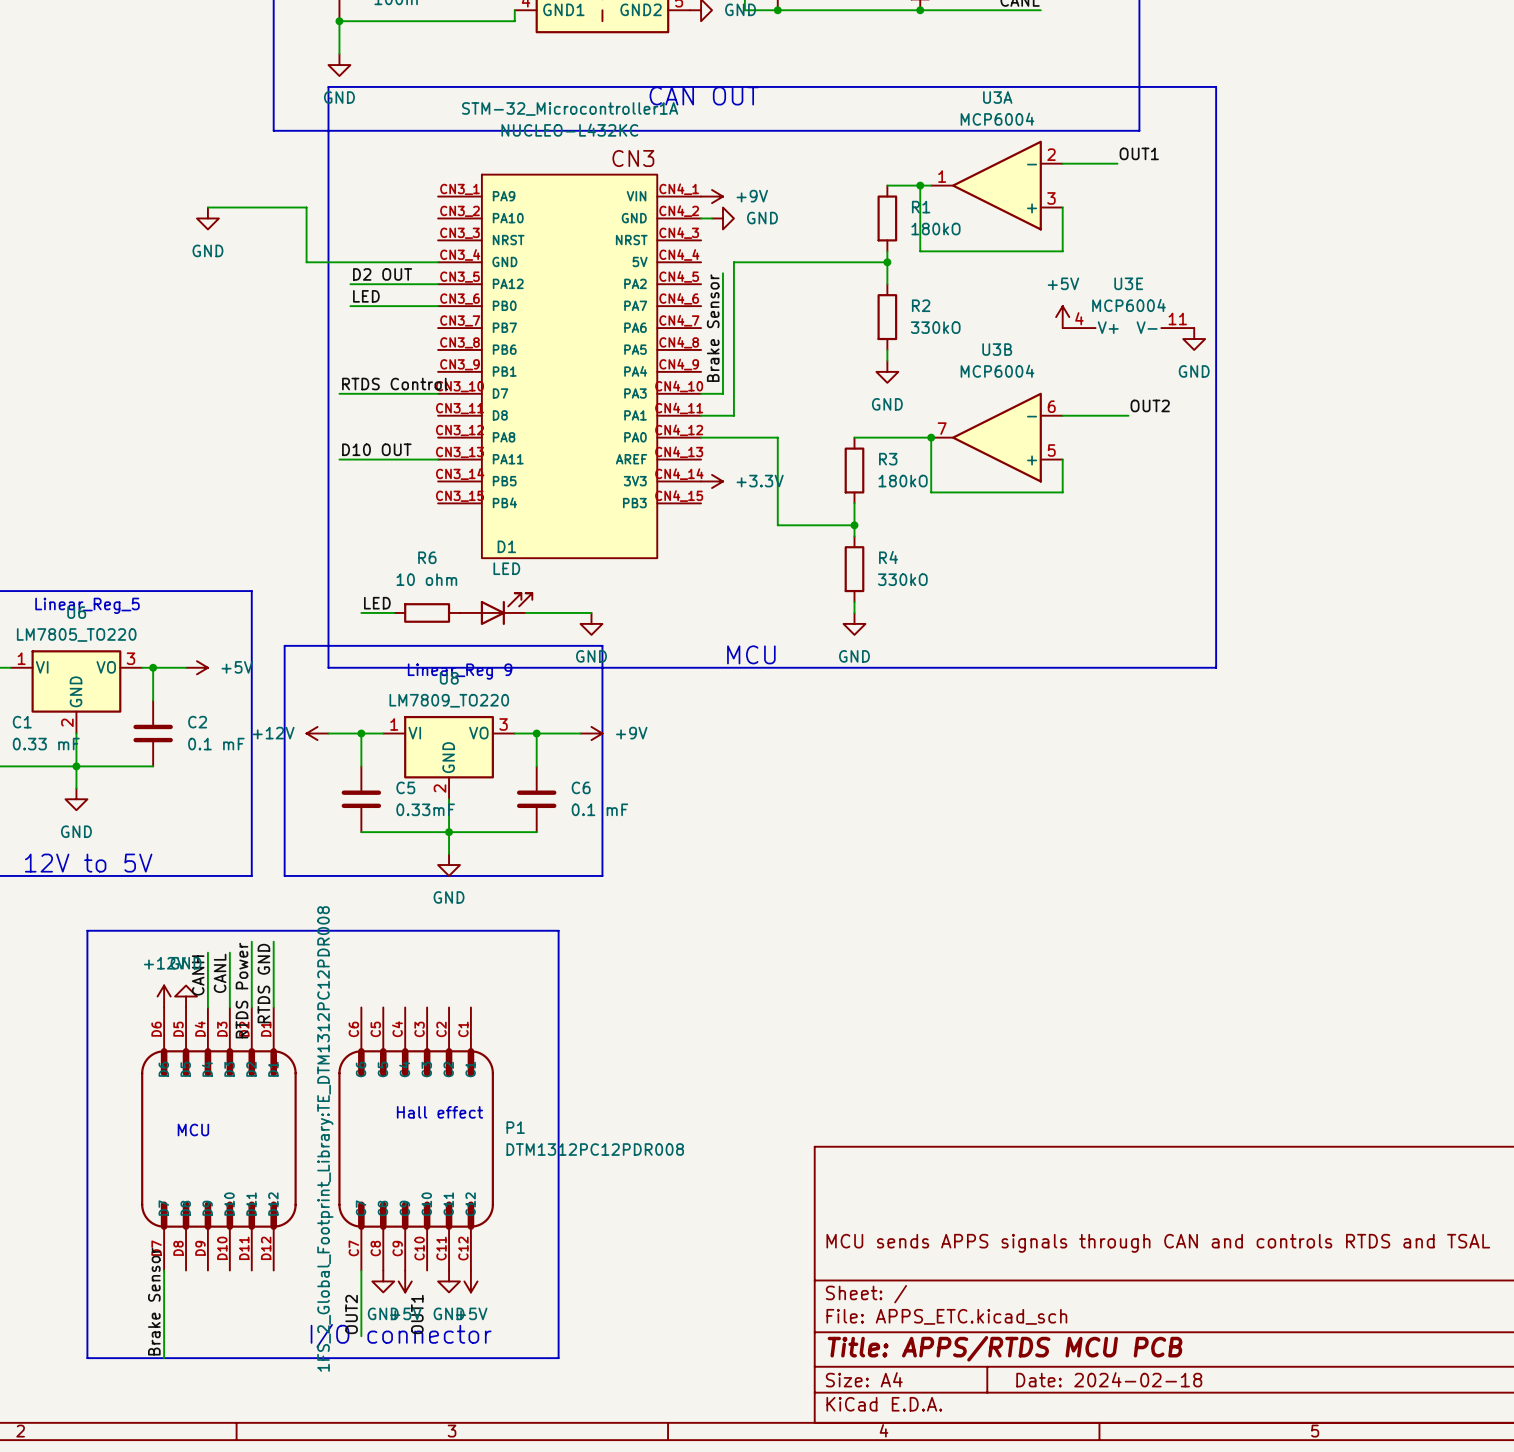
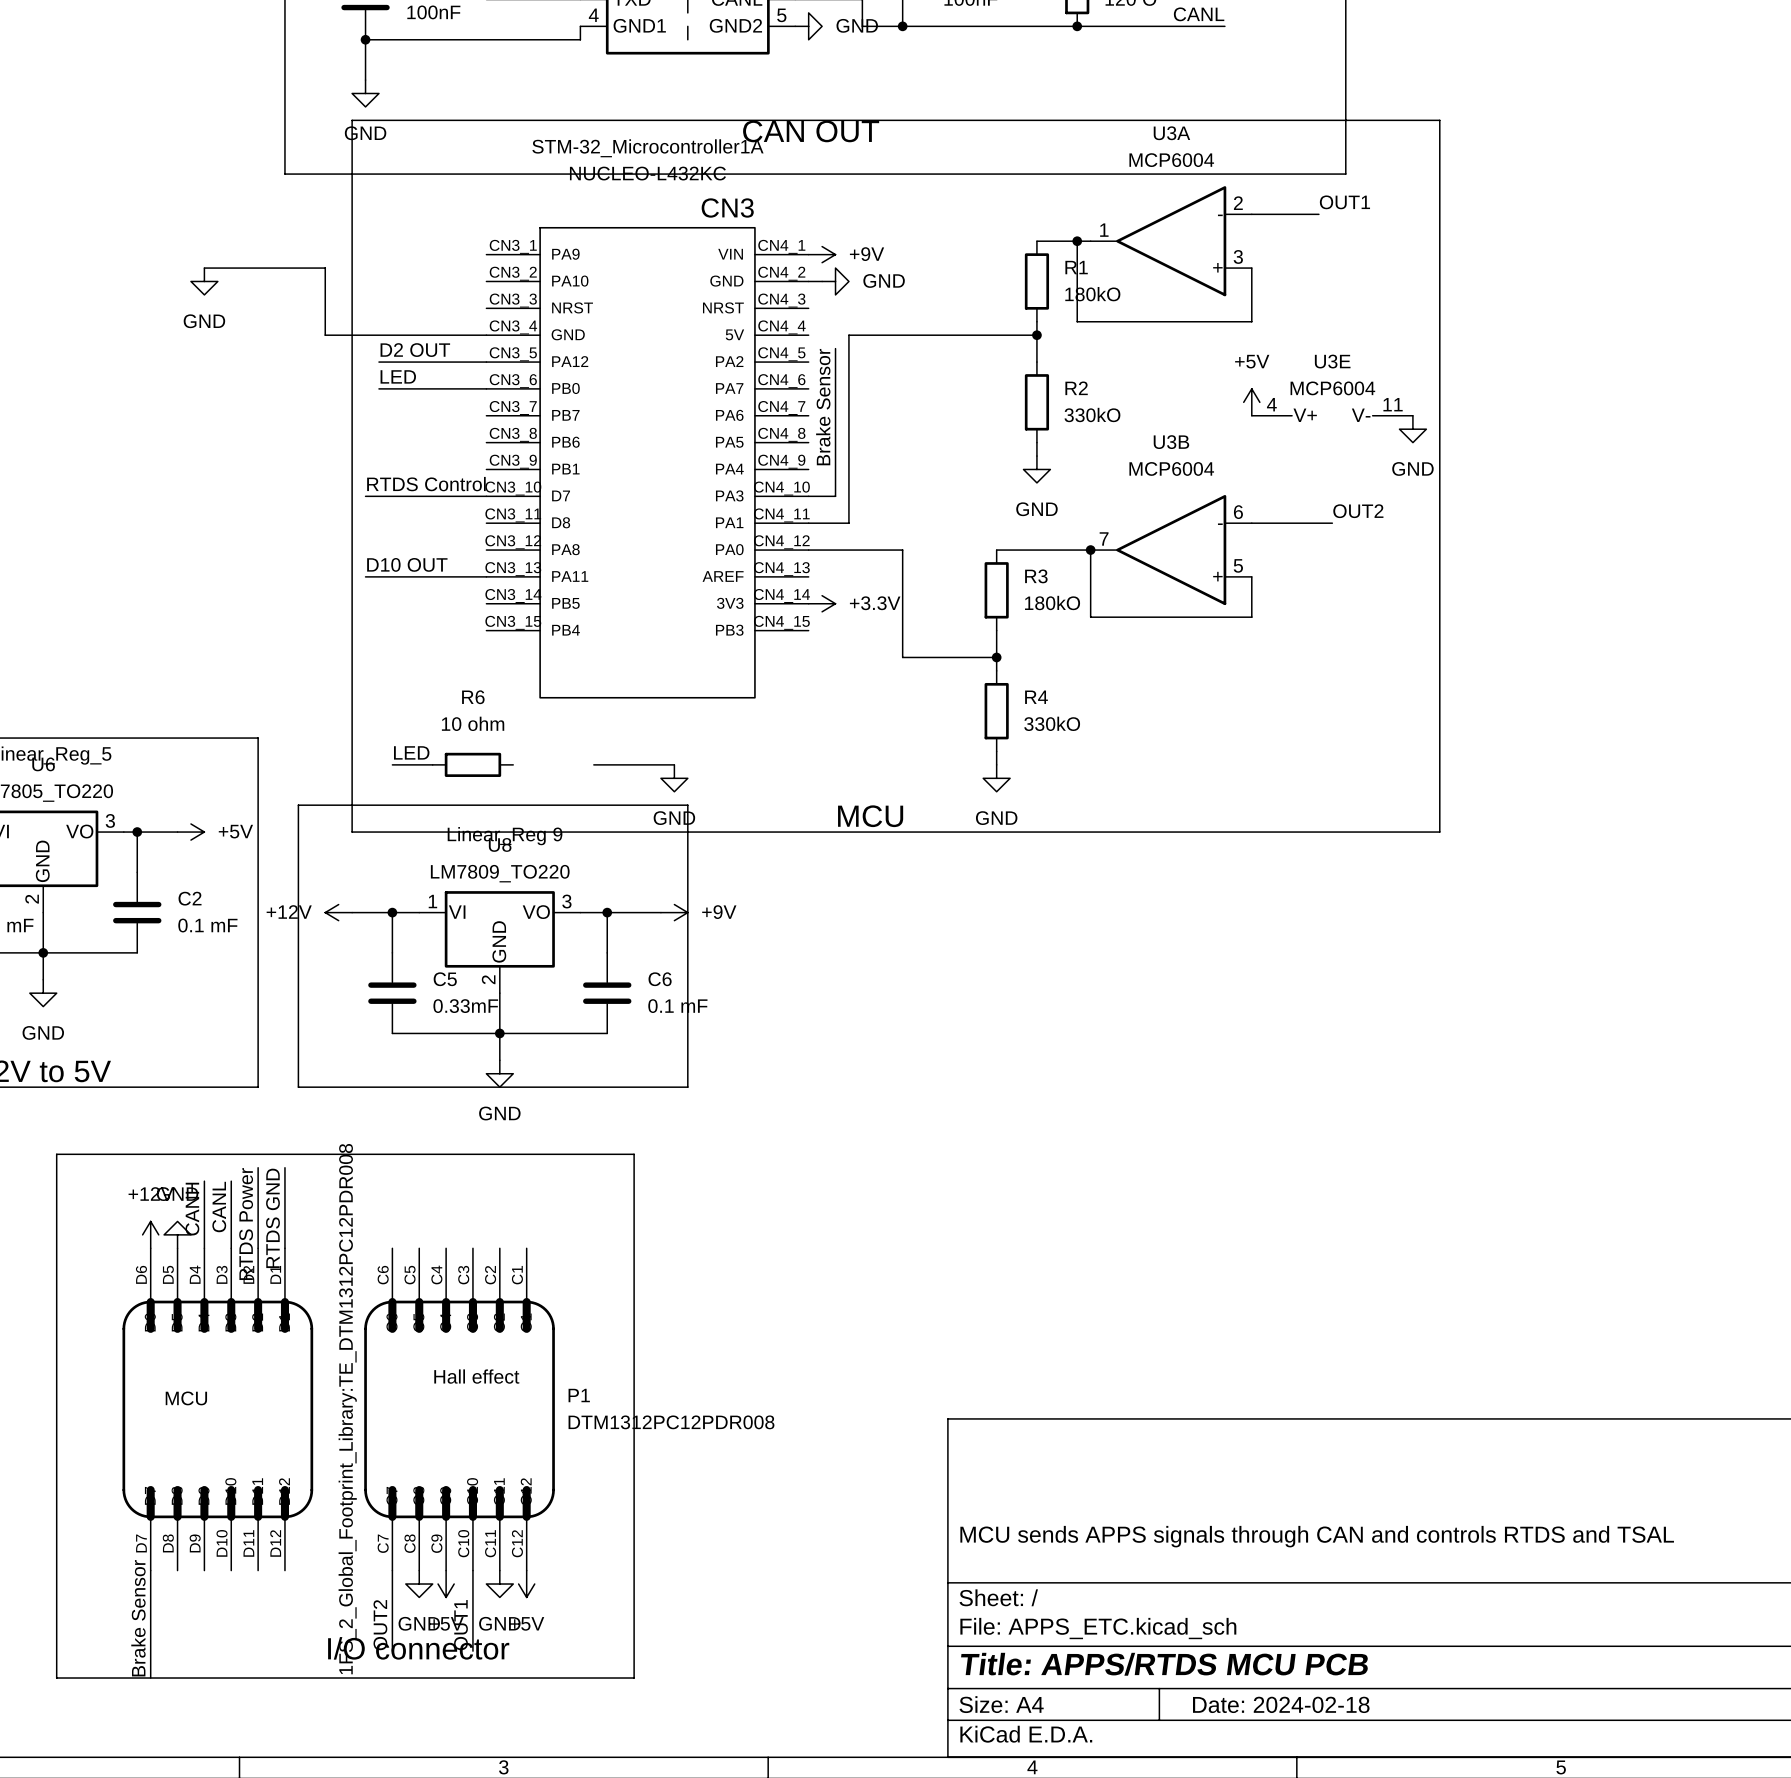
D1: LED (496, 609) -> none
wire: none -> (472, 1570) (472, 1651)

